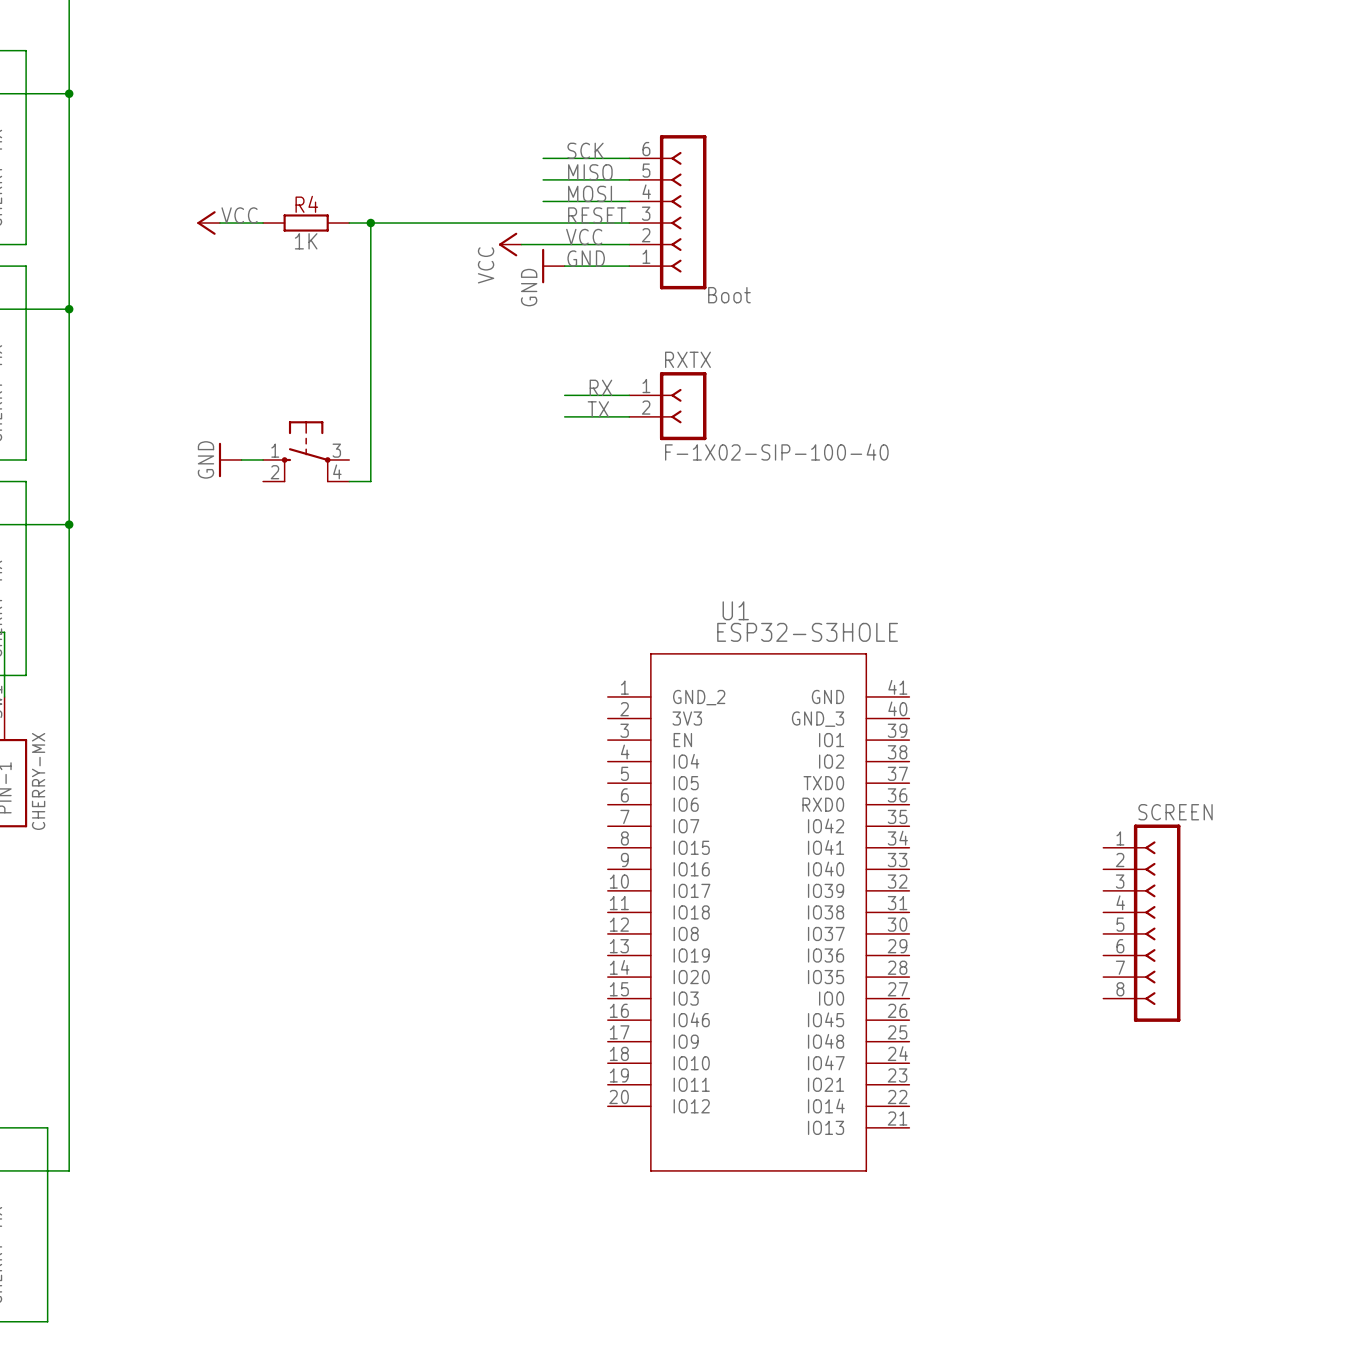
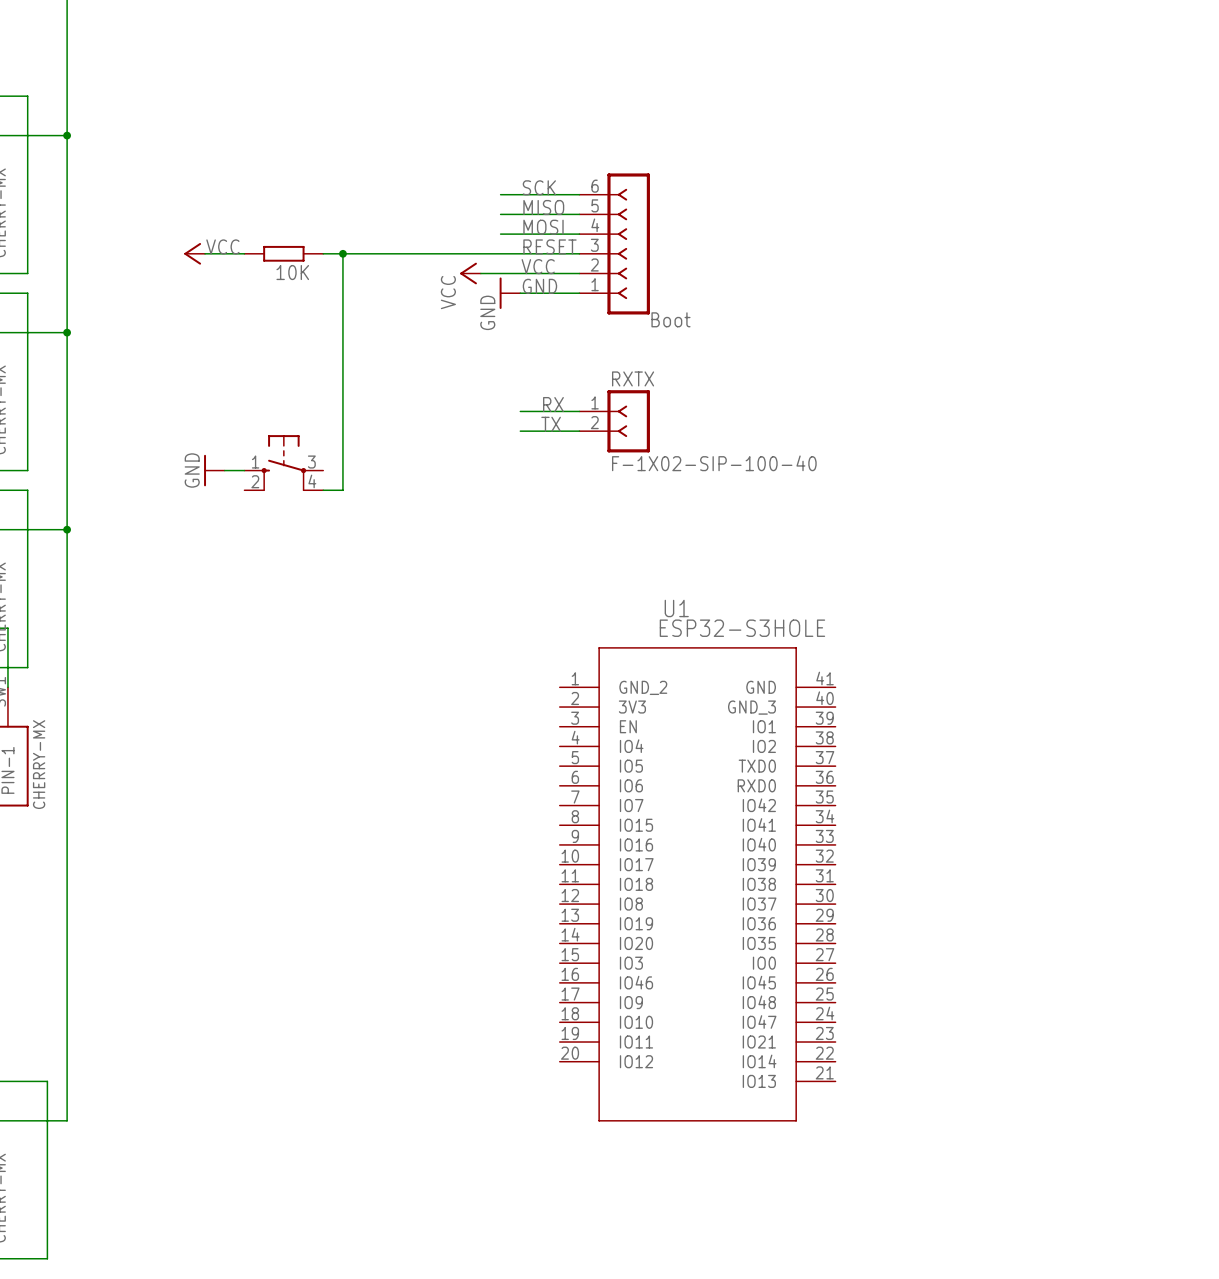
R4 name: R4 (306, 204) -> none
R4 value: 1K (306, 241) -> 10K (292, 272)
SCREEN: (1141, 923) -> none

